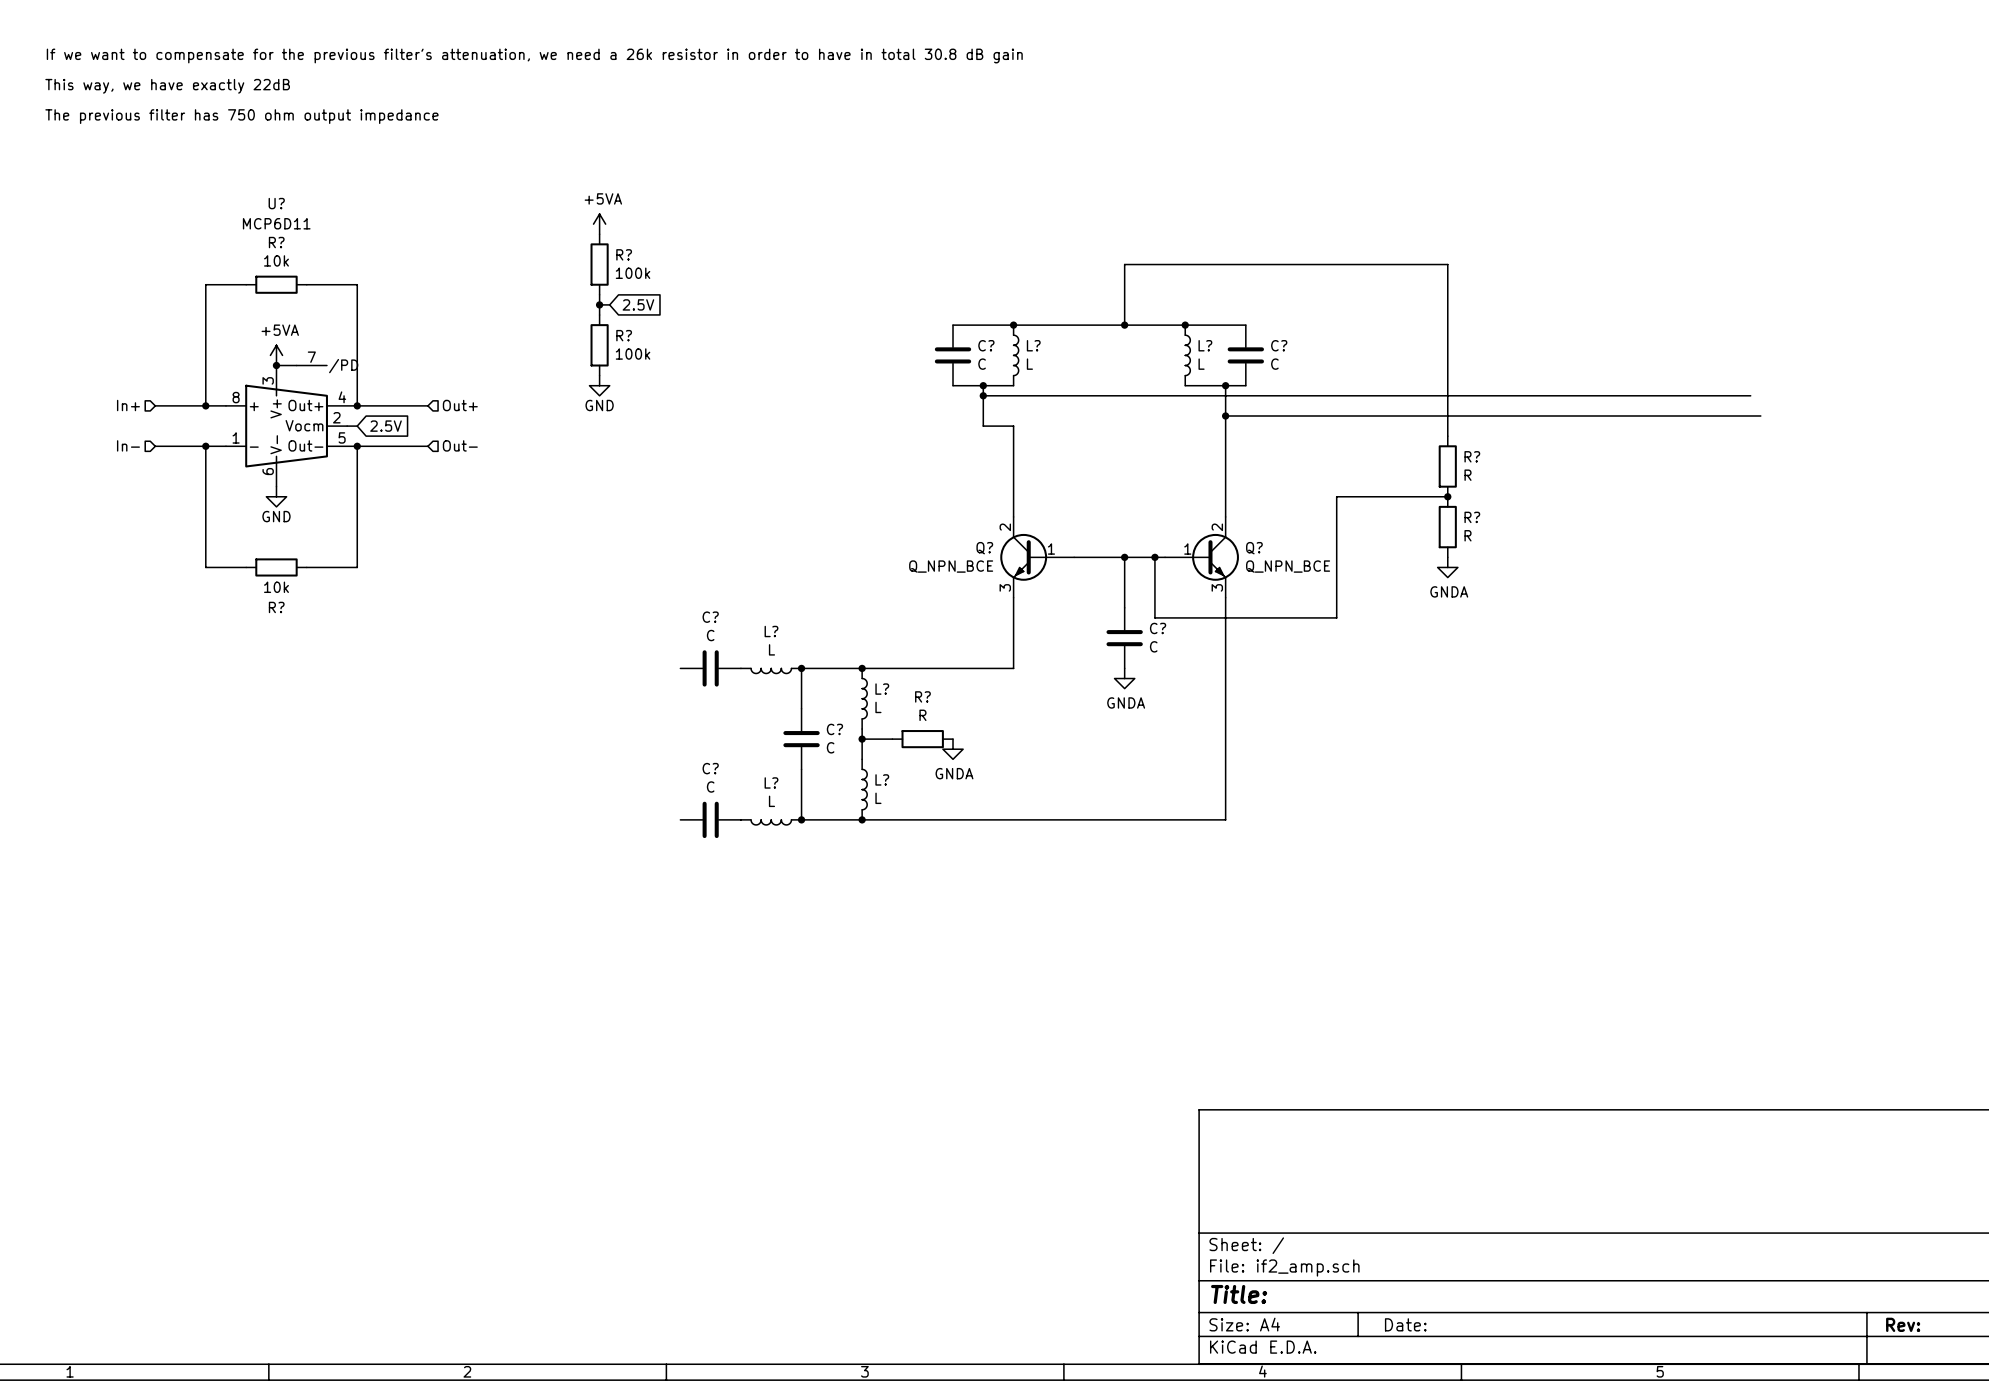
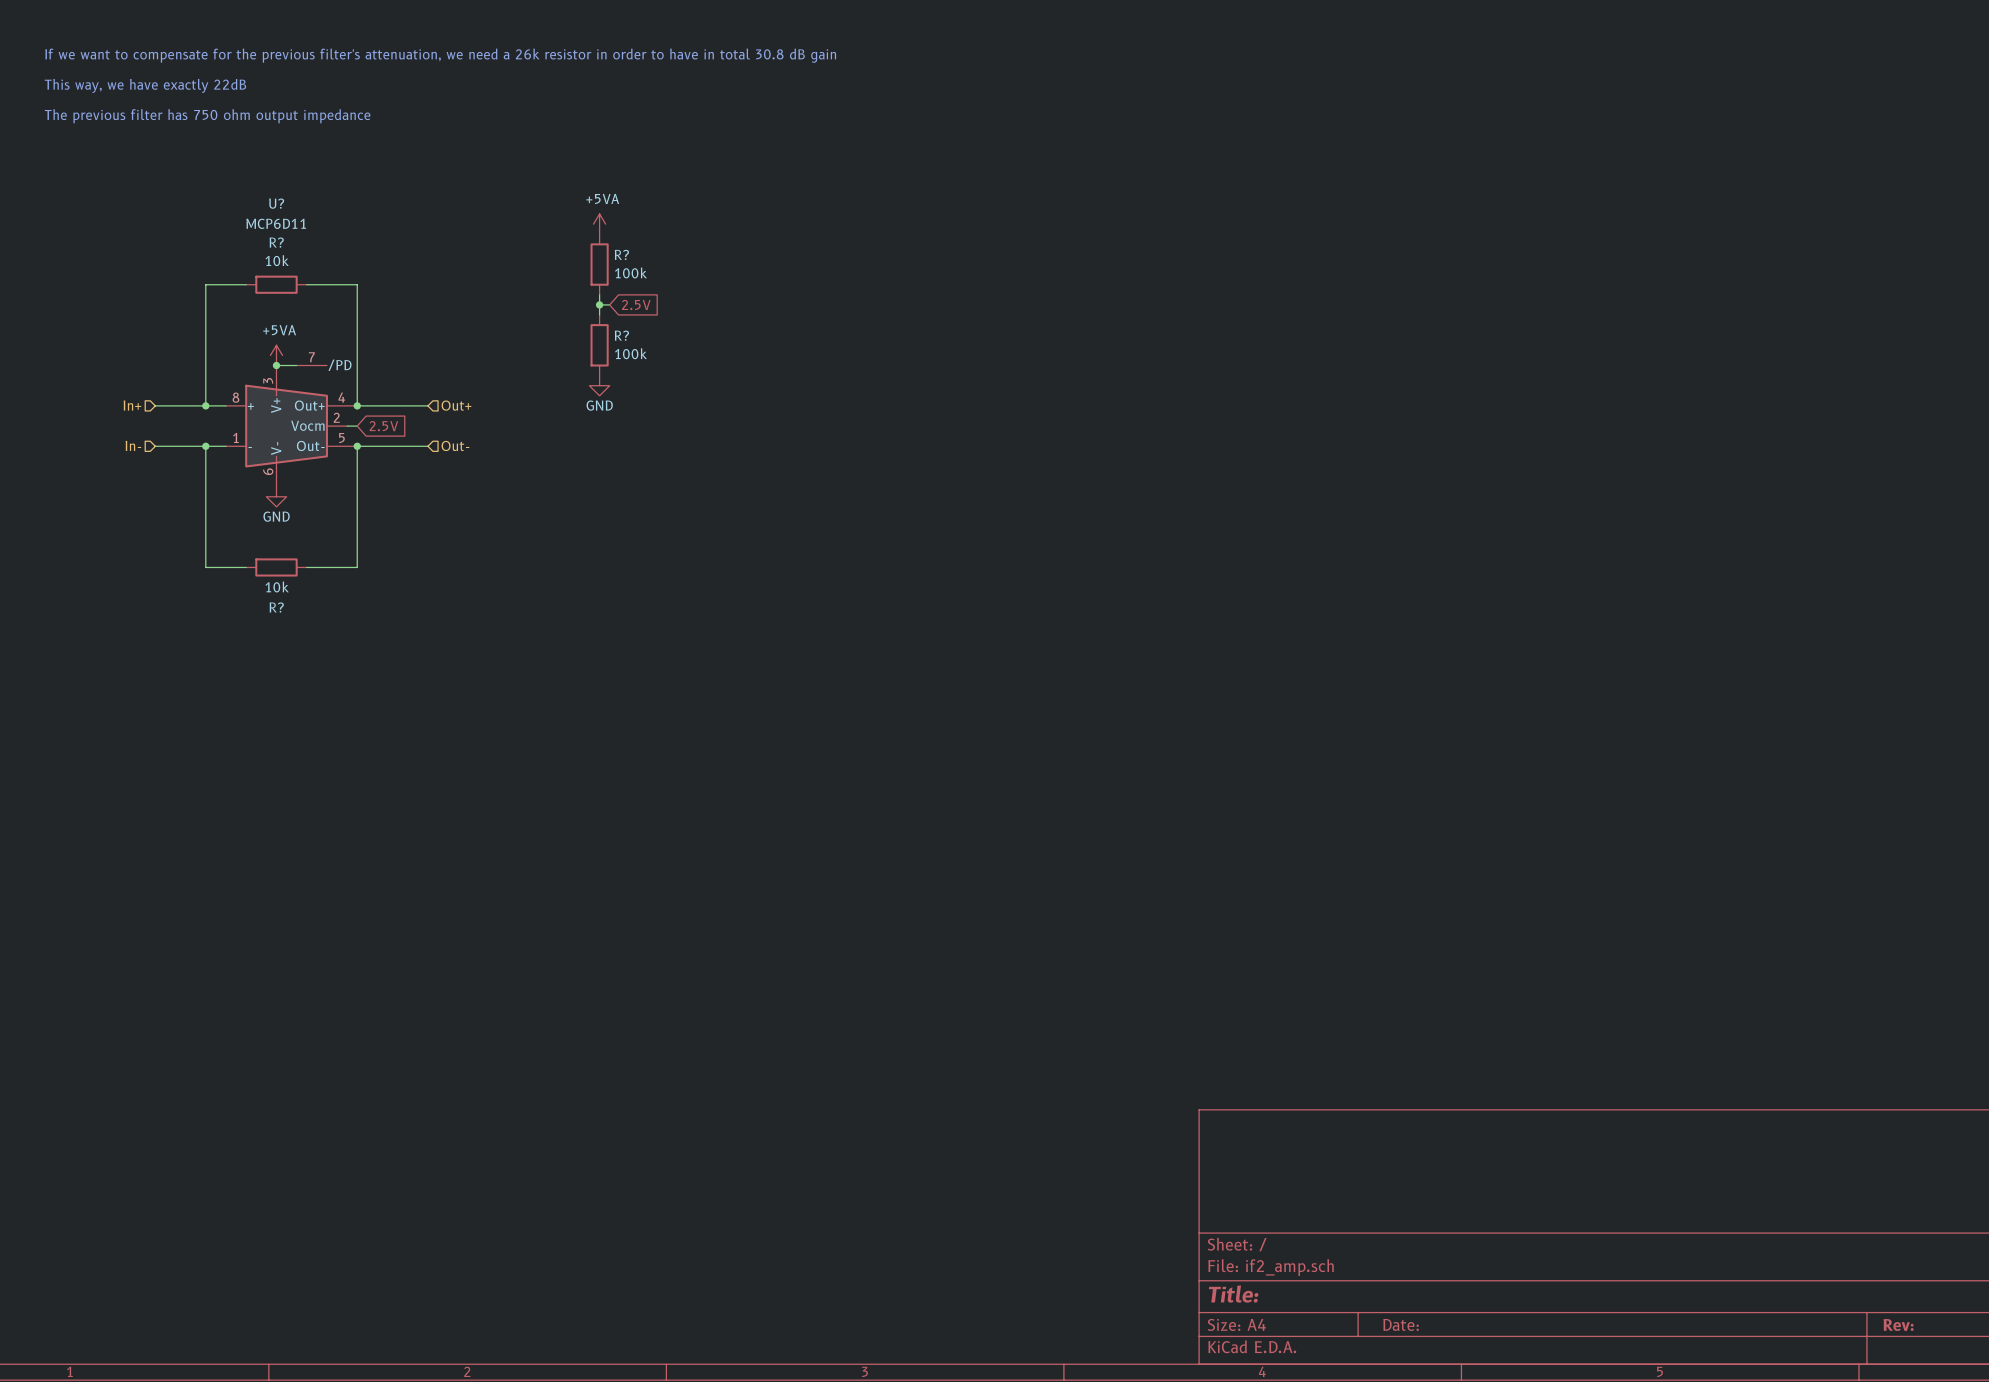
wire: (953, 325) (1245, 325) -> none
junction: (1013, 325) -> none
wire: (1124, 325) (1124, 264) (1447, 264) (1447, 436) -> none
junction: (1124, 325) -> none
junction: (1185, 325) -> none
C?: C (953, 355) -> none
L?: L (1016, 355) -> none
L?: L (1187, 355) -> none
C?: C (1245, 355) -> none
wire: (953, 385) (1013, 385) -> none
wire: (983, 385) (983, 426) (1013, 426) (1013, 516) -> none
junction: (983, 385) -> none
wire: (1185, 385) (1245, 385) -> none
wire: (1225, 385) (1225, 516) -> none
junction: (1225, 385) -> none
wire: (983, 395) (1750, 395) -> none
junction: (983, 395) -> none
wire: (1225, 415) (1760, 415) -> none
junction: (1225, 415) -> none
R?: R (1447, 466) -> none
wire: (1447, 496) (1336, 496) (1336, 617) (1154, 617) (1154, 557) -> none
junction: (1447, 496) -> none
R?: R (1447, 527) -> none
Q?: Q_NPN_BCE (1037, 557) -> none
wire: (1074, 557) (1165, 557) -> none
wire: (1124, 557) (1124, 607) -> none
junction: (1124, 557) -> none
junction: (1154, 557) -> none
Q?: Q_NPN_BCE (1202, 557) -> none
power symbol: GNDA (1447, 567) -> none
wire: (1013, 597) (1013, 668) (801, 668) (801, 708) -> none
wire: (1225, 597) (1225, 819) (801, 819) (801, 769) -> none
C?: C (1124, 638) -> none
C?: C (710, 668) -> none
junction: (801, 668) -> none
junction: (862, 668) -> none
L?: L (771, 670) -> none
power symbol: GNDA (1124, 678) -> none
L?: L (864, 698) -> none
wire: (862, 729) (862, 759) -> none
C?: C (801, 739) -> none
wire: (862, 739) (892, 739) -> none
junction: (862, 739) -> none
R?: R (922, 739) -> none
power symbol: GNDA (953, 749) -> none
L?: L (864, 789) -> none
C?: C (710, 819) -> none
junction: (801, 819) -> none
junction: (862, 819) -> none
L?: L (771, 822) -> none

